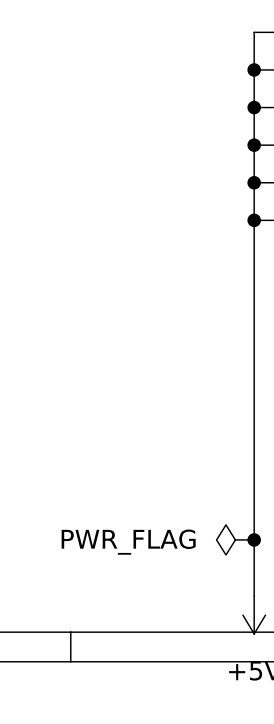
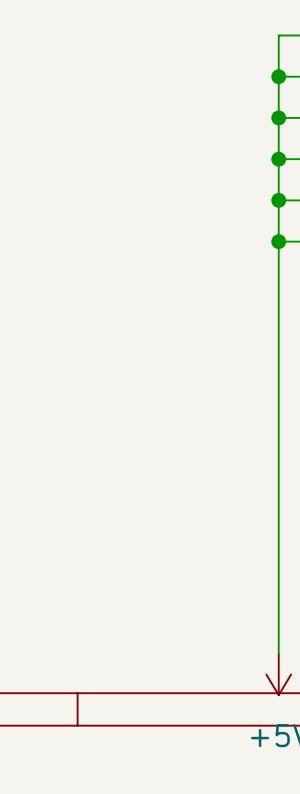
power symbol: PWR_FLAG (235, 539) -> none
junction: (254, 539) -> none

